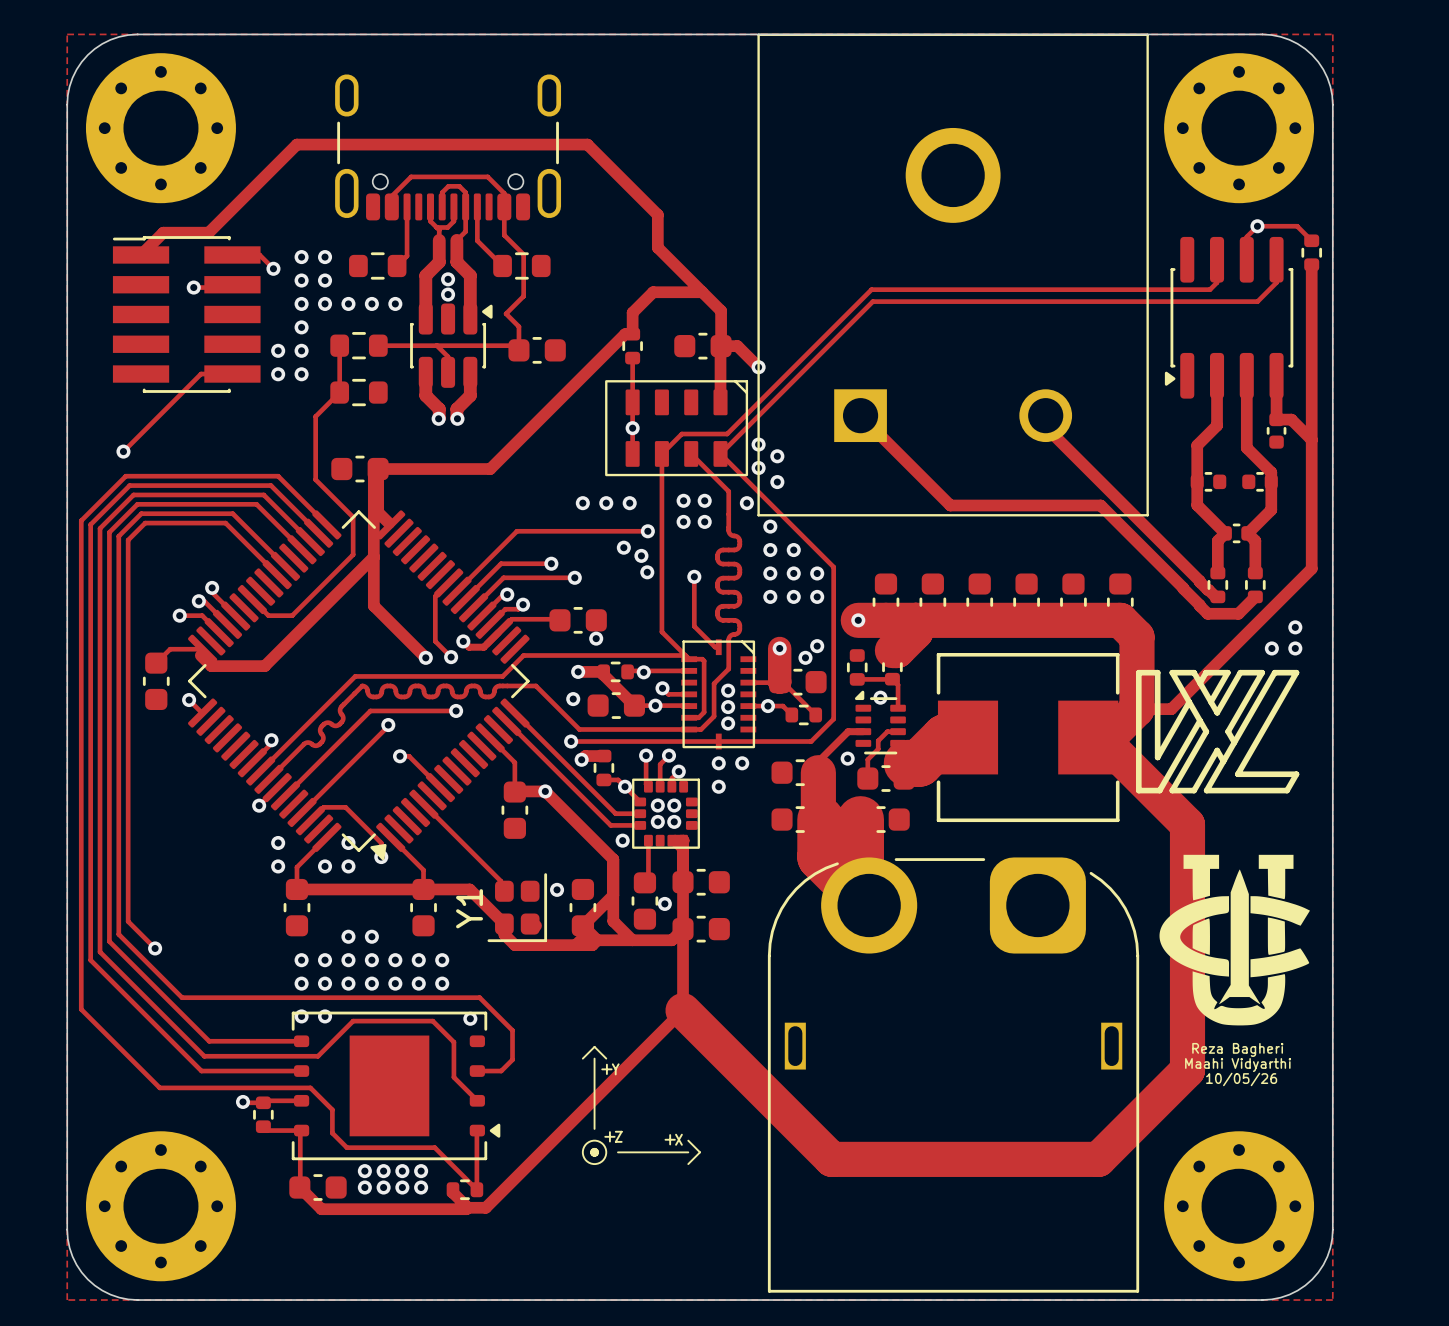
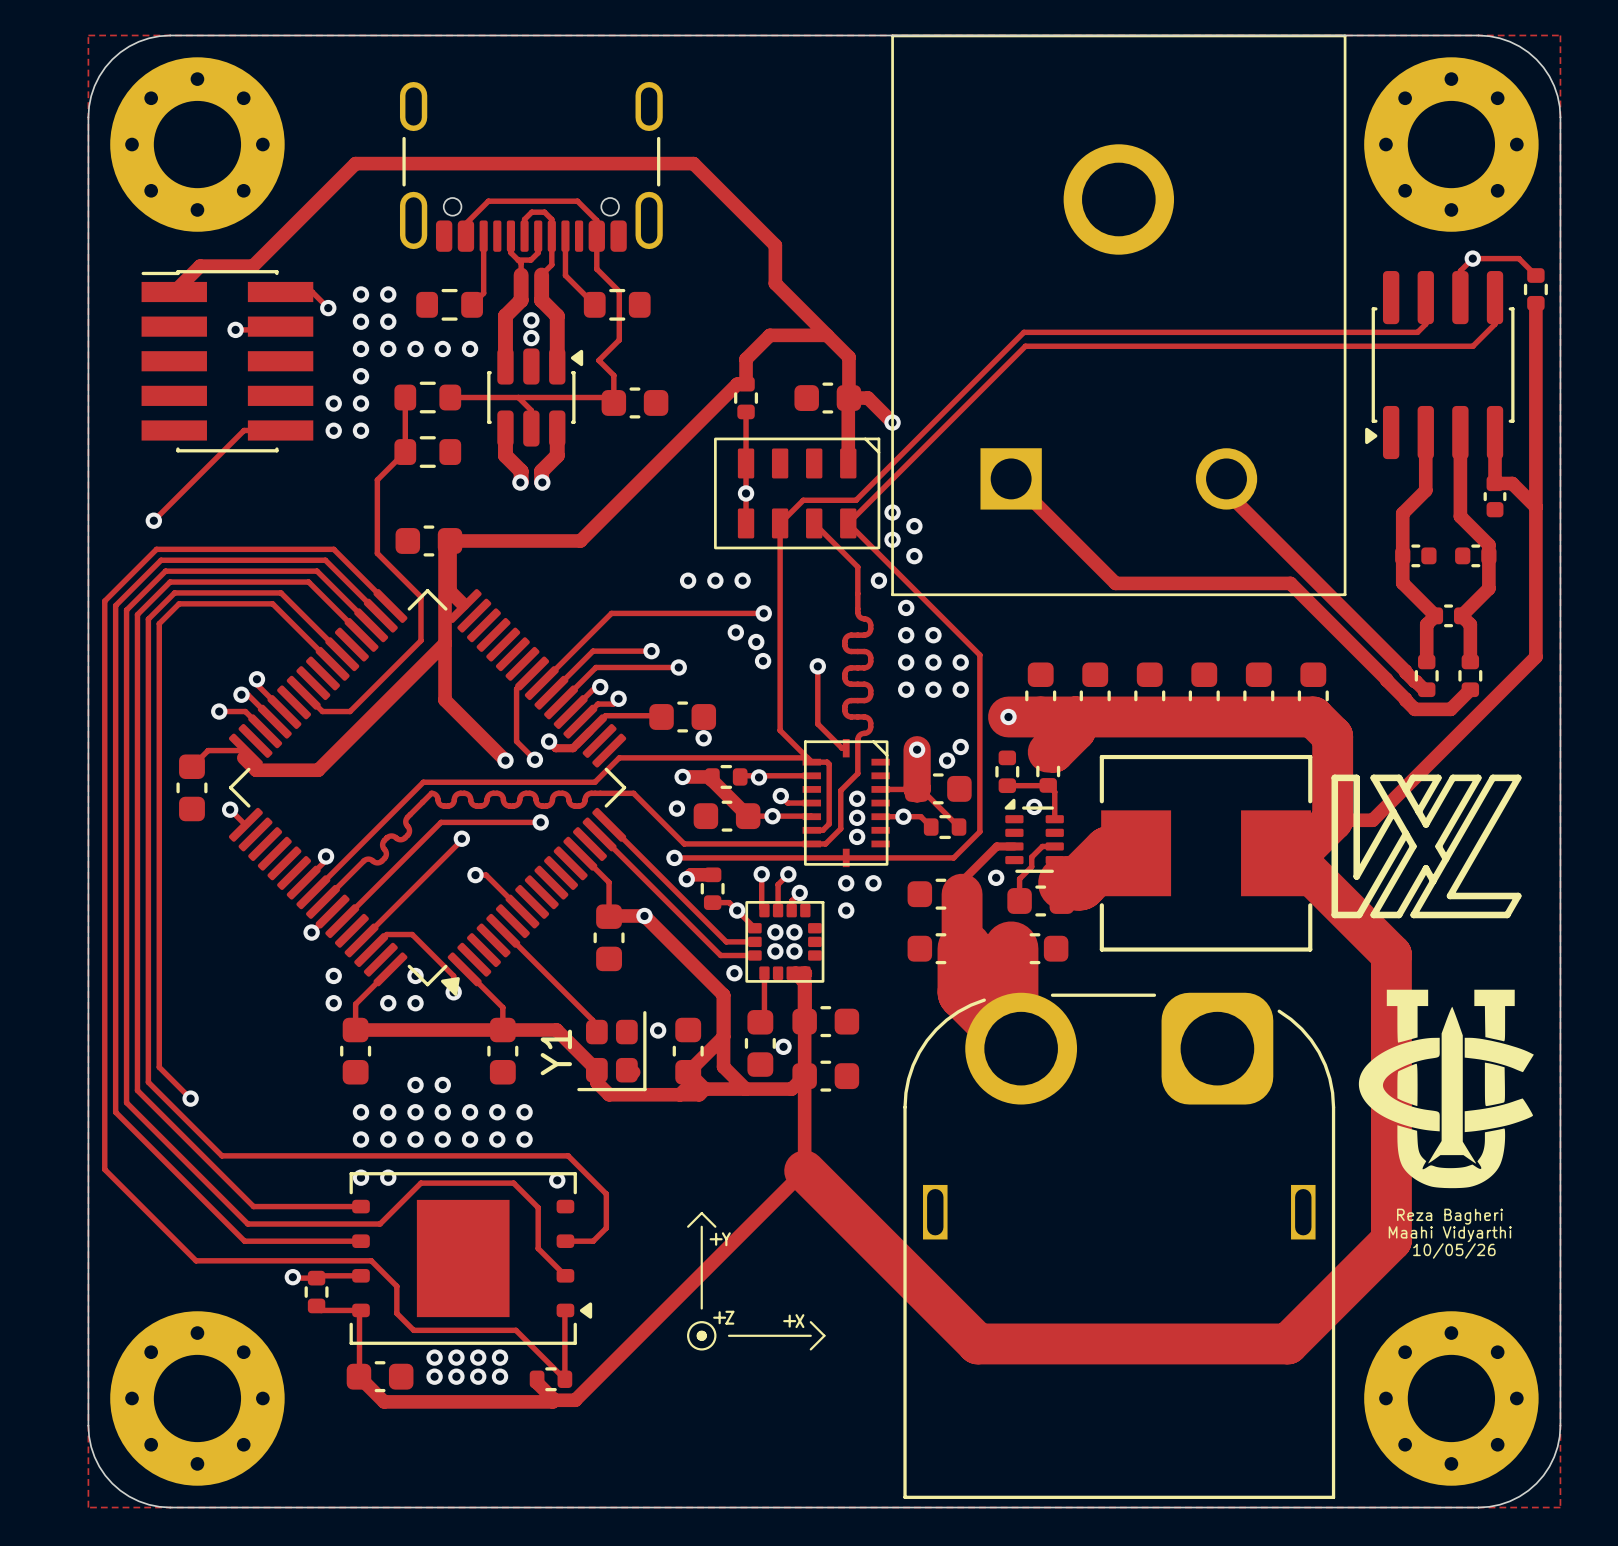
via: (683, 500) -> none
via: (704, 500) -> none
via: (683, 521) -> none
via: (704, 521) -> none
via: (1295, 627) -> none
via: (1271, 648) -> none
via: (1295, 648) -> none

